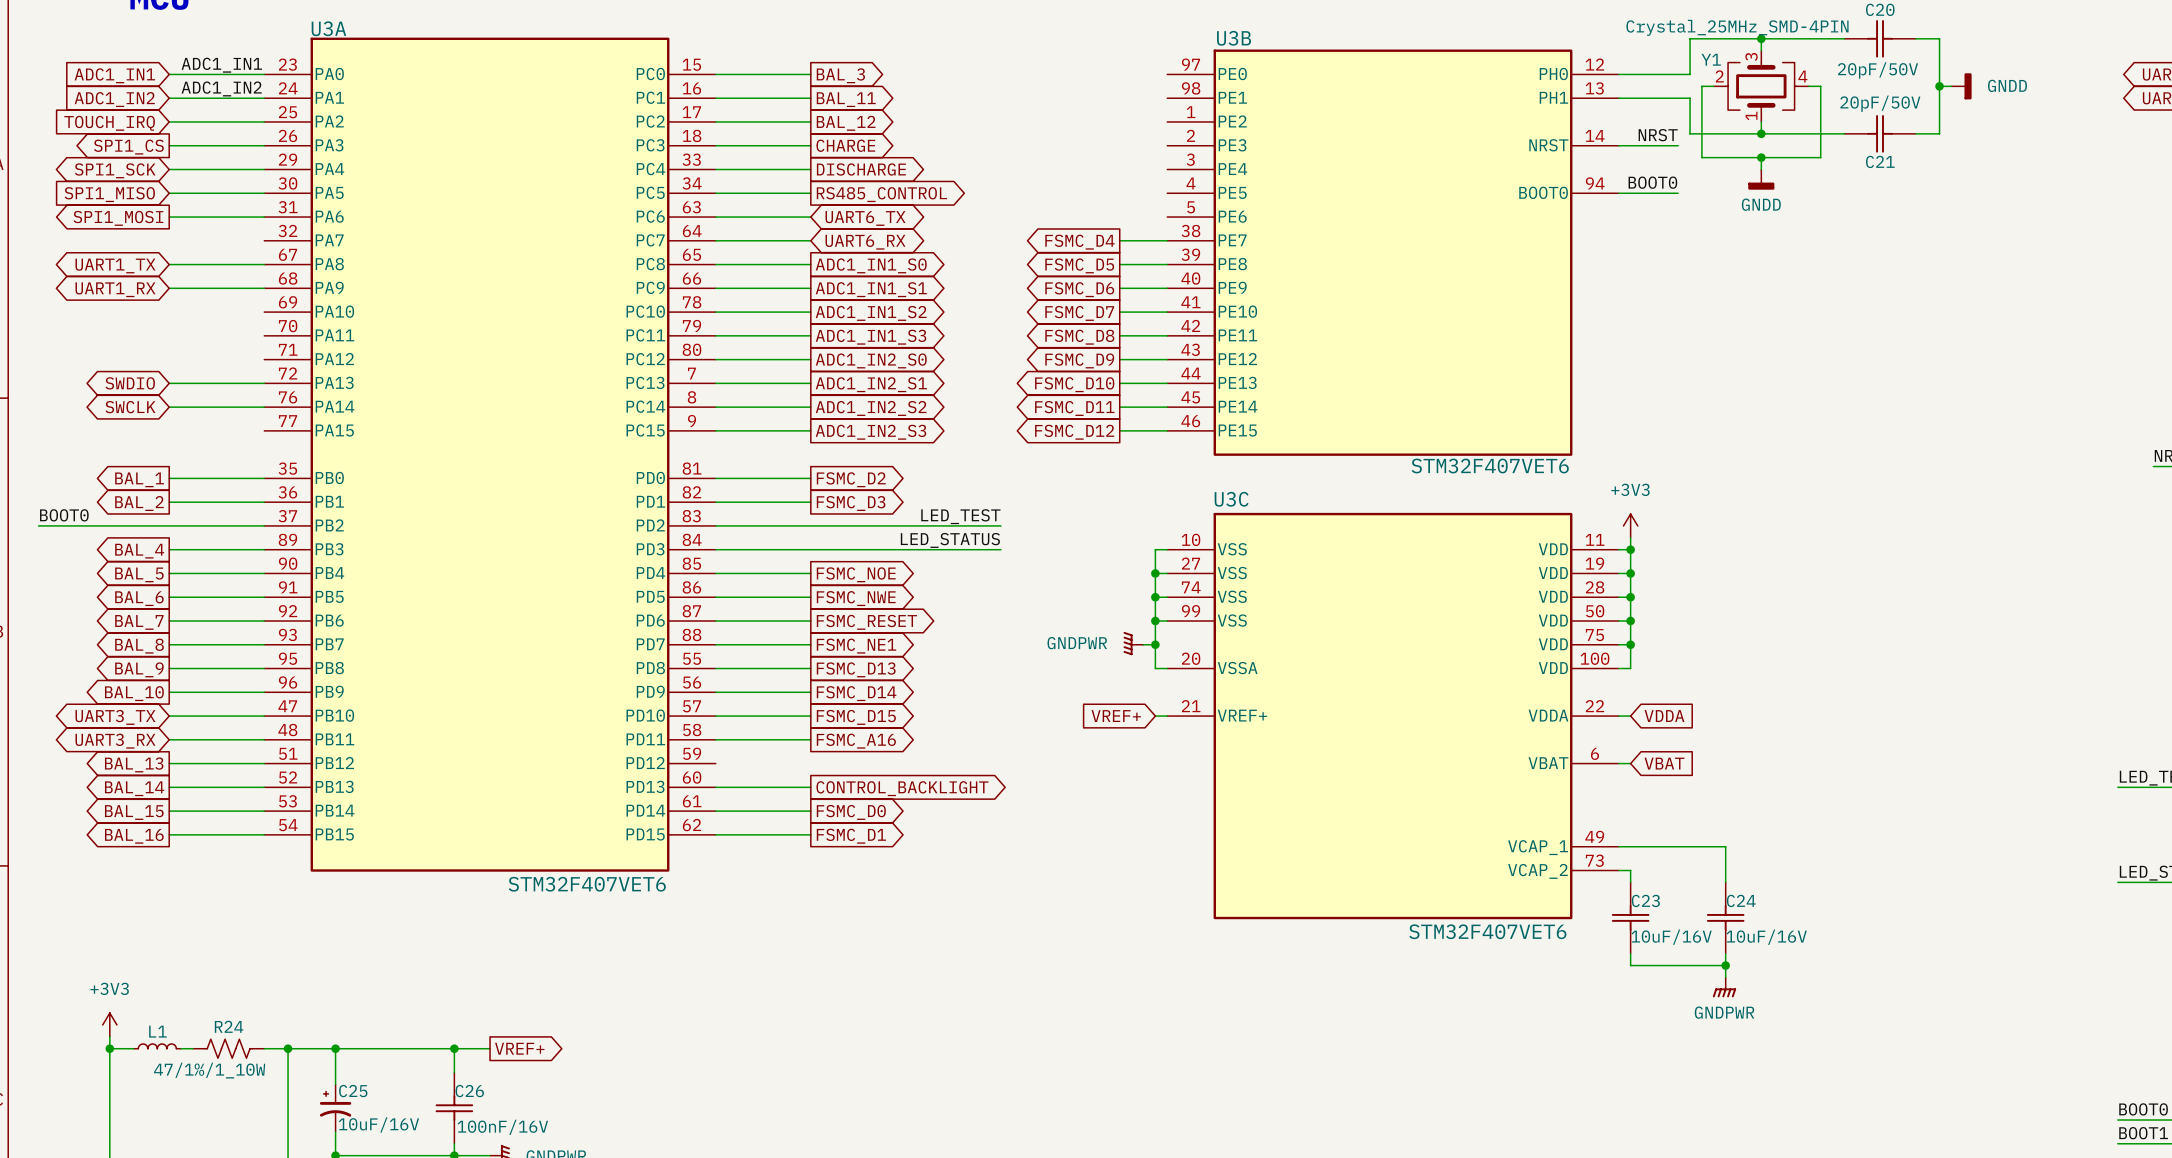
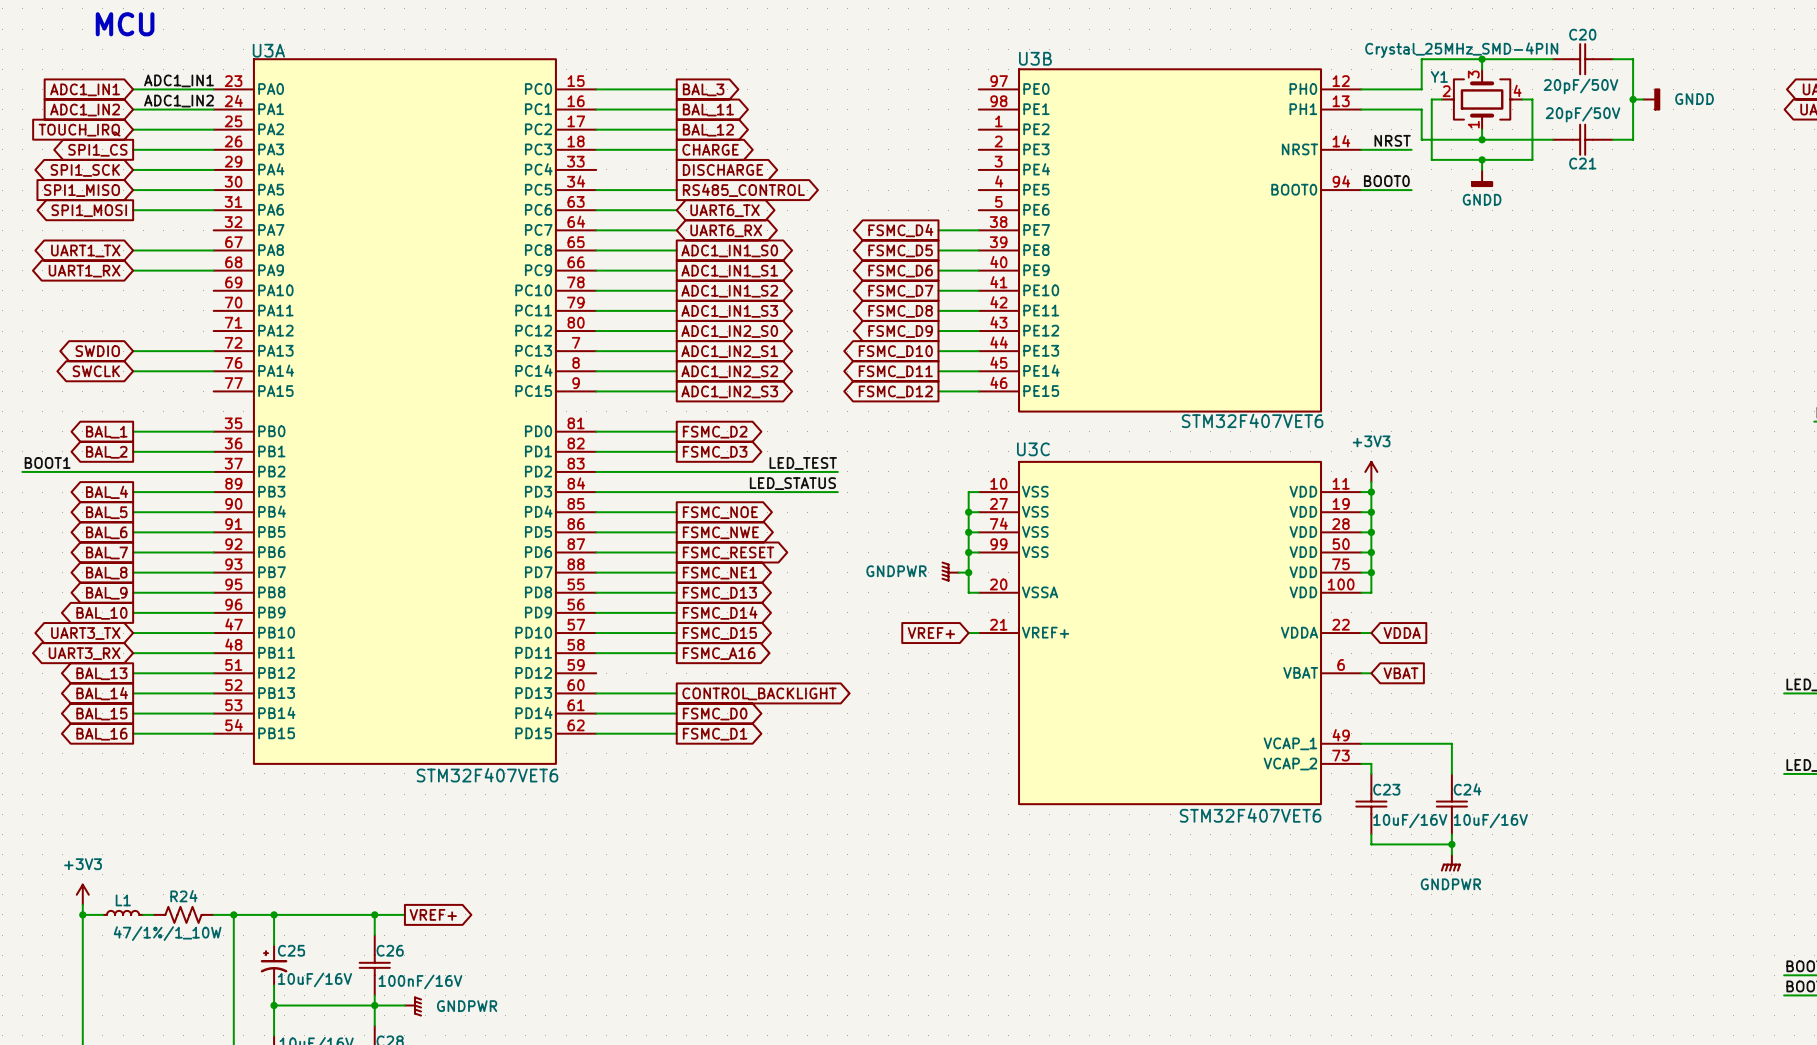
wire: (715, 169) (810, 169) -> none
label: BOOT0 (64, 515) -> BOOT1 (47, 462)

